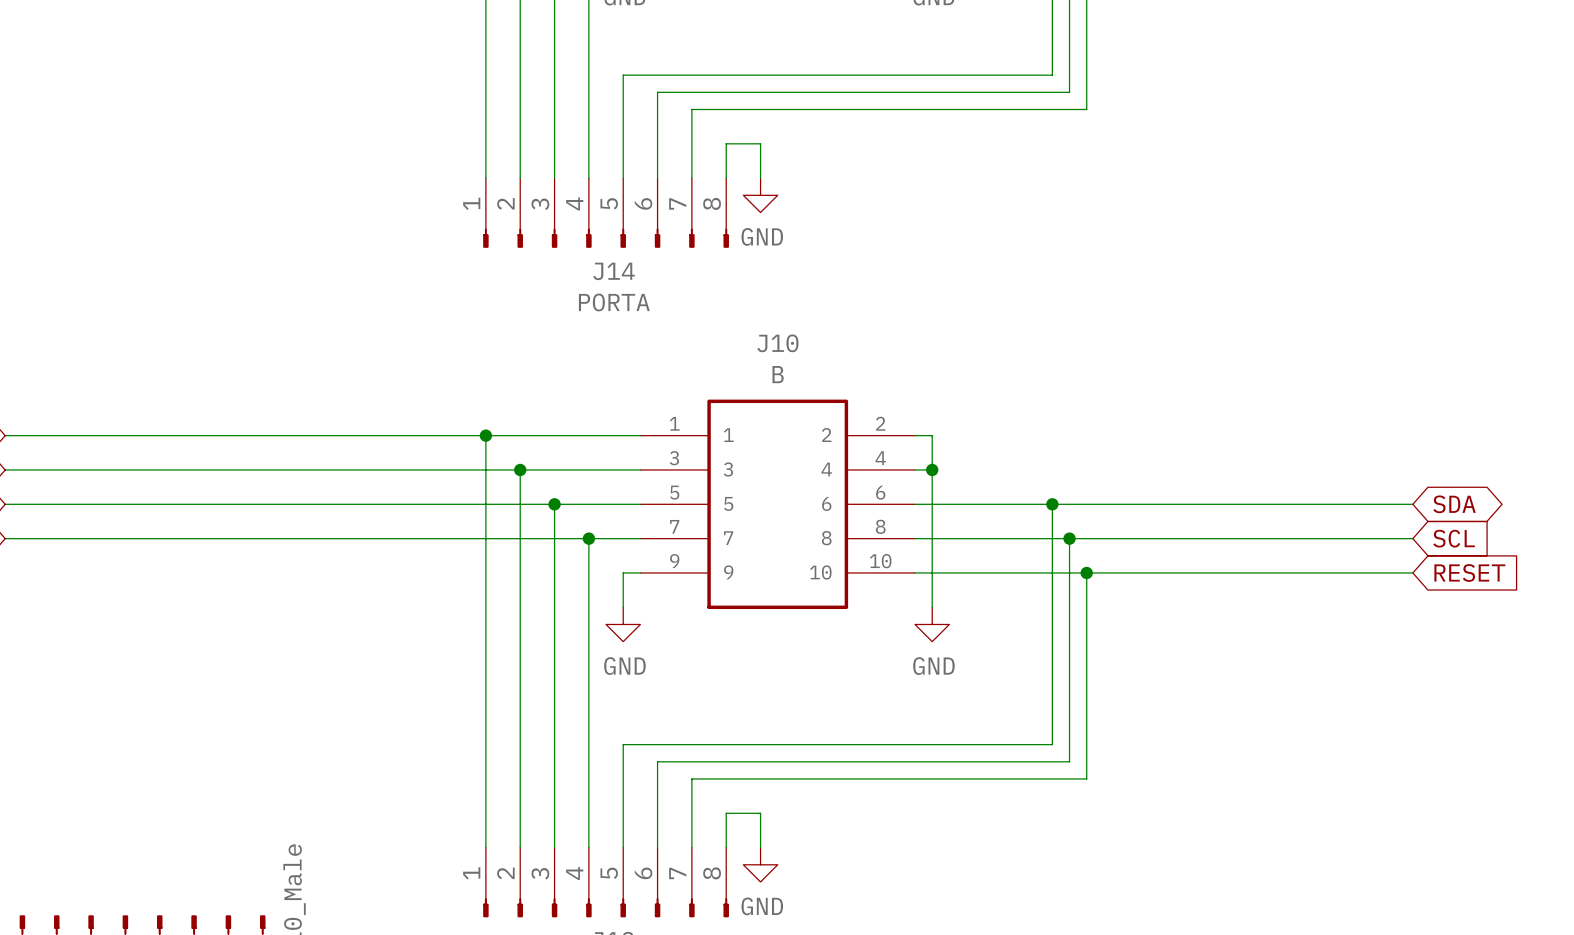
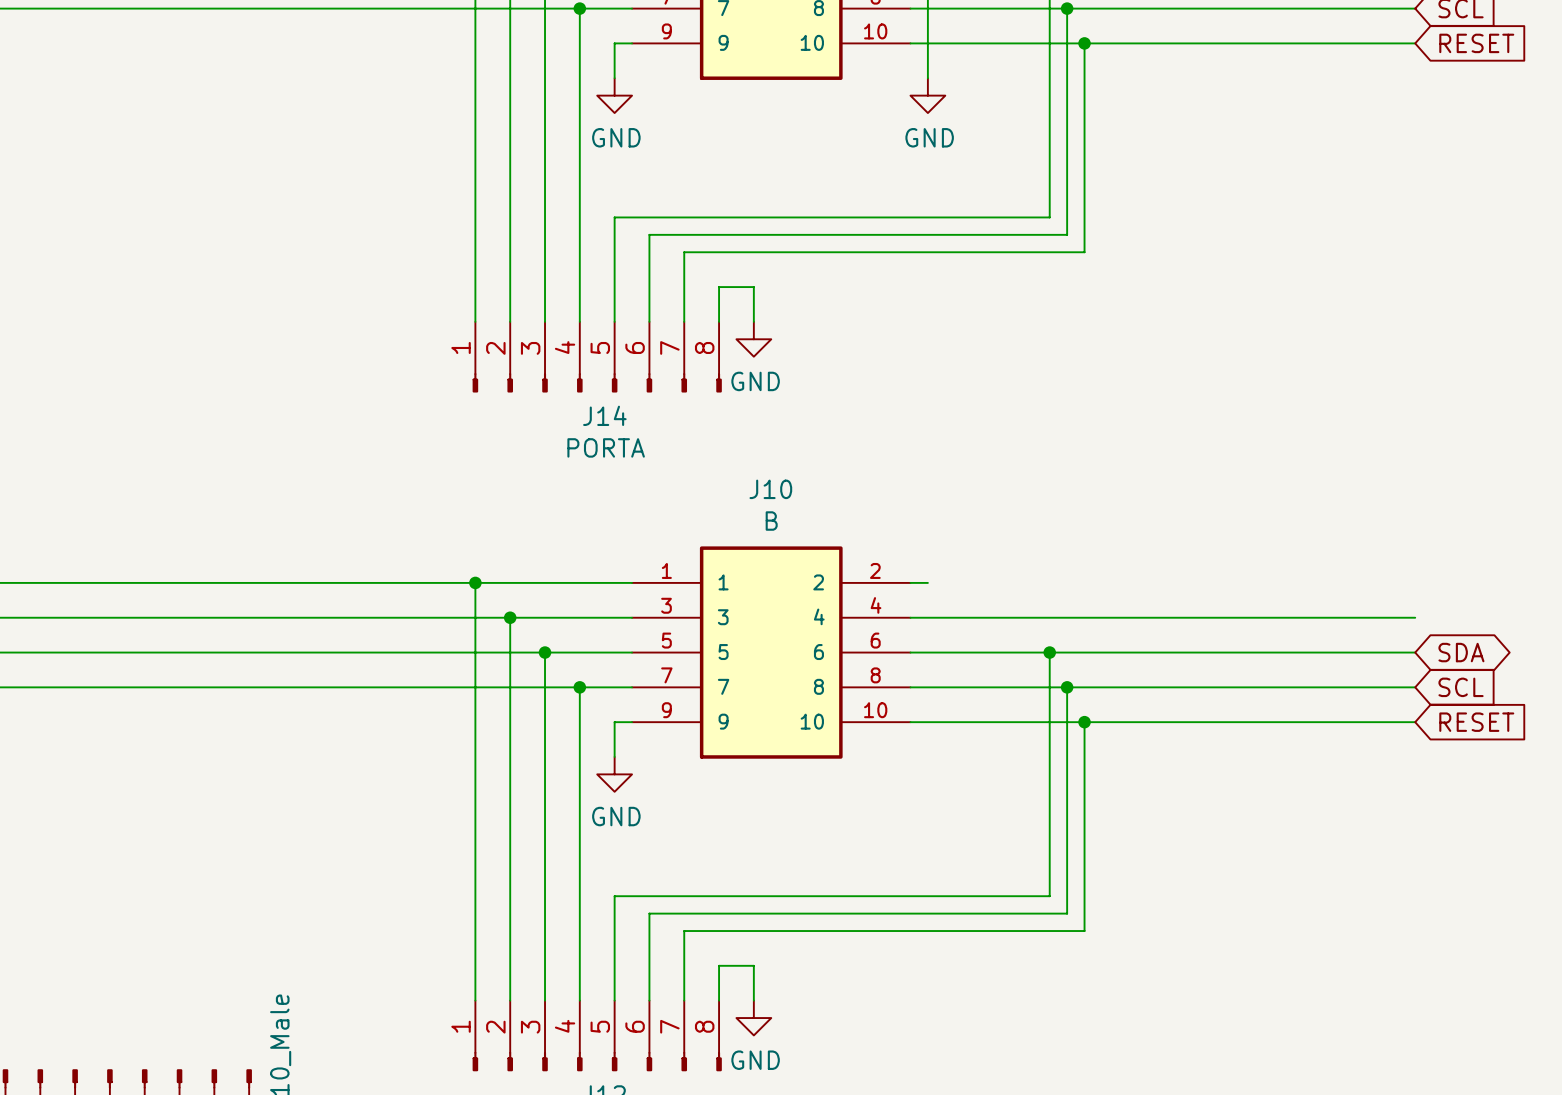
wire: (932, 435) (932, 607) -> none
wire: none -> (927, 617) (1415, 617)
junction: (932, 469) -> none
power symbol: GND (932, 624) -> none

